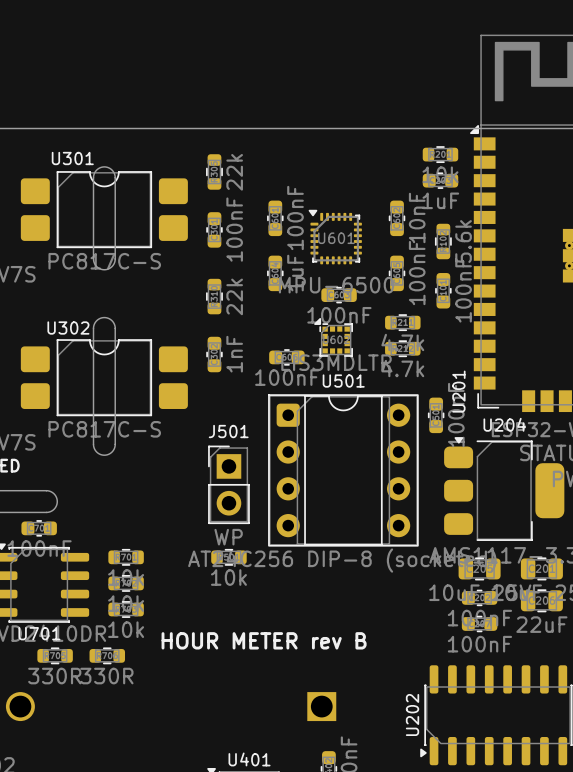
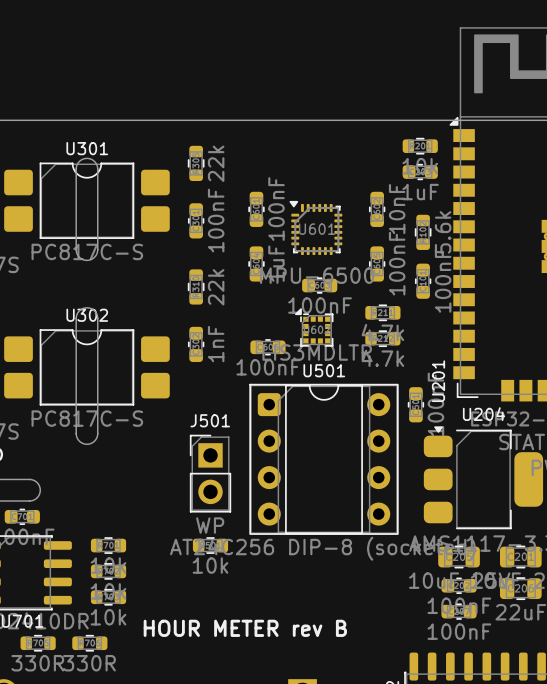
U301 name position: U301 (72, 158) -> U301 (87, 148)
U302 name position: U302 (68, 328) -> U302 (87, 315)

